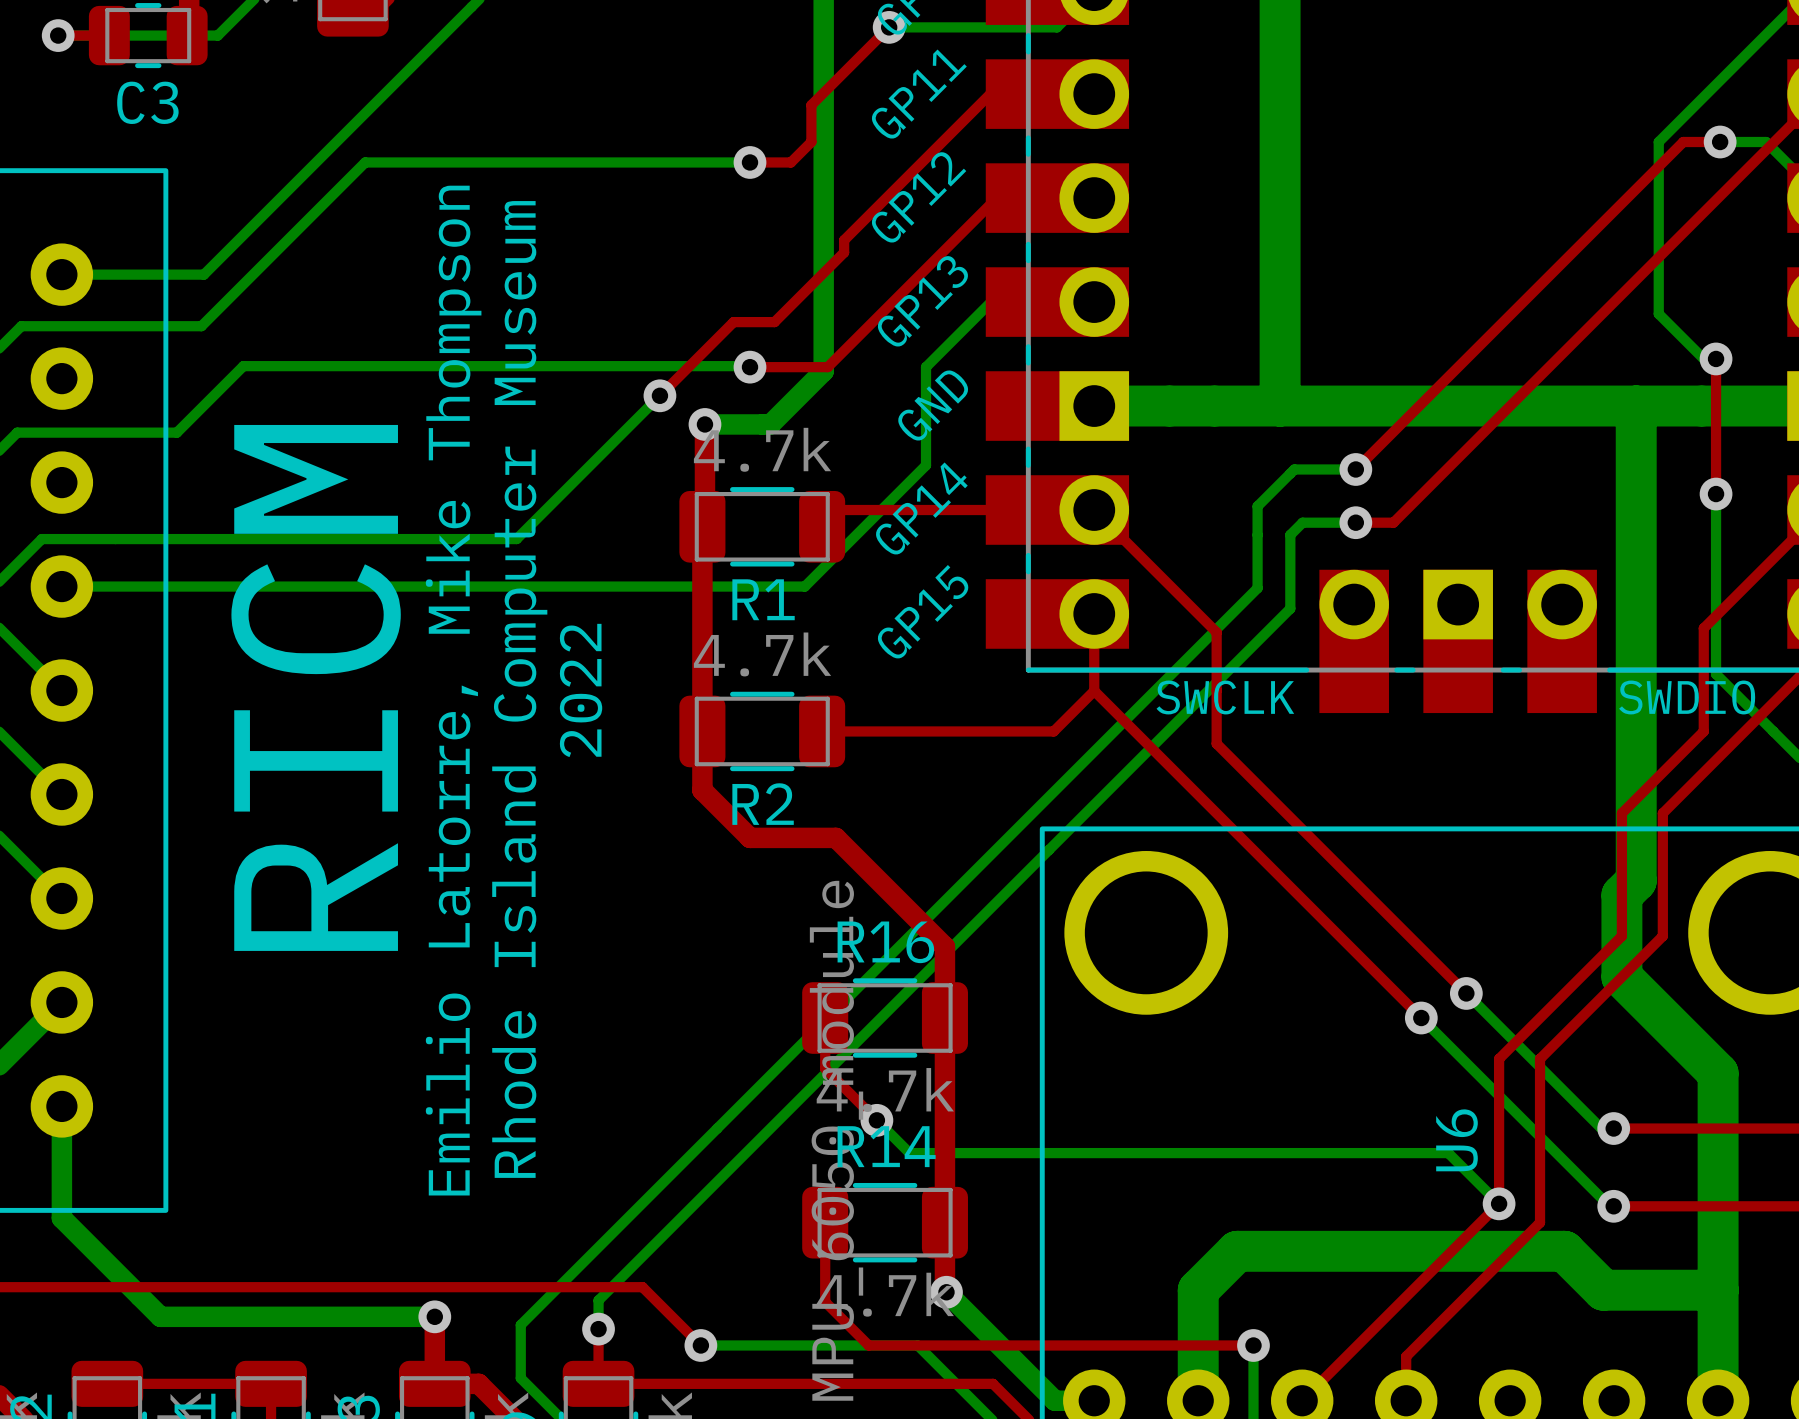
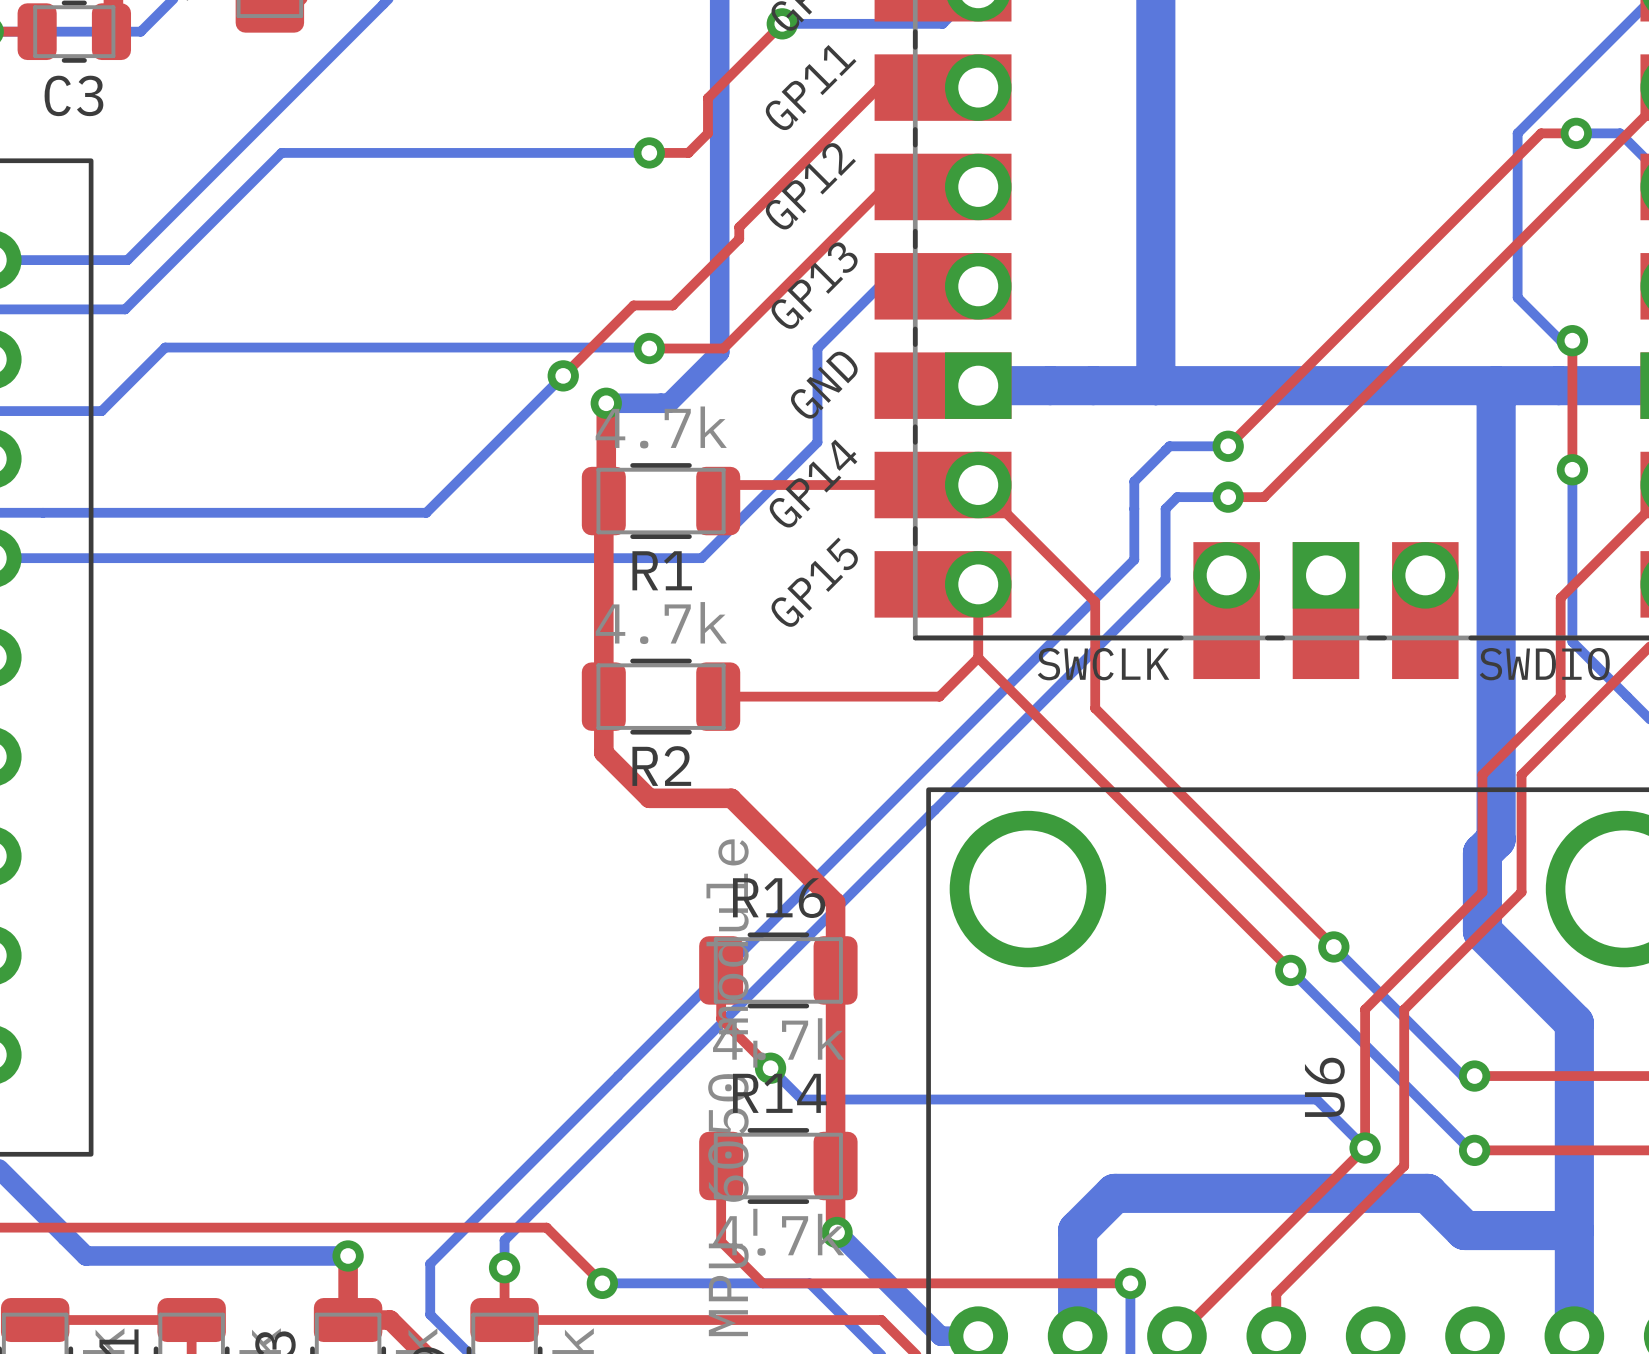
text: RICM (316, 687) -> none
text: Rhode Island Computer Museum (519, 689) -> none
text: Emilio Latorre, Mike Thompson (453, 690) -> none
text: 2022 (581, 690) -> none

